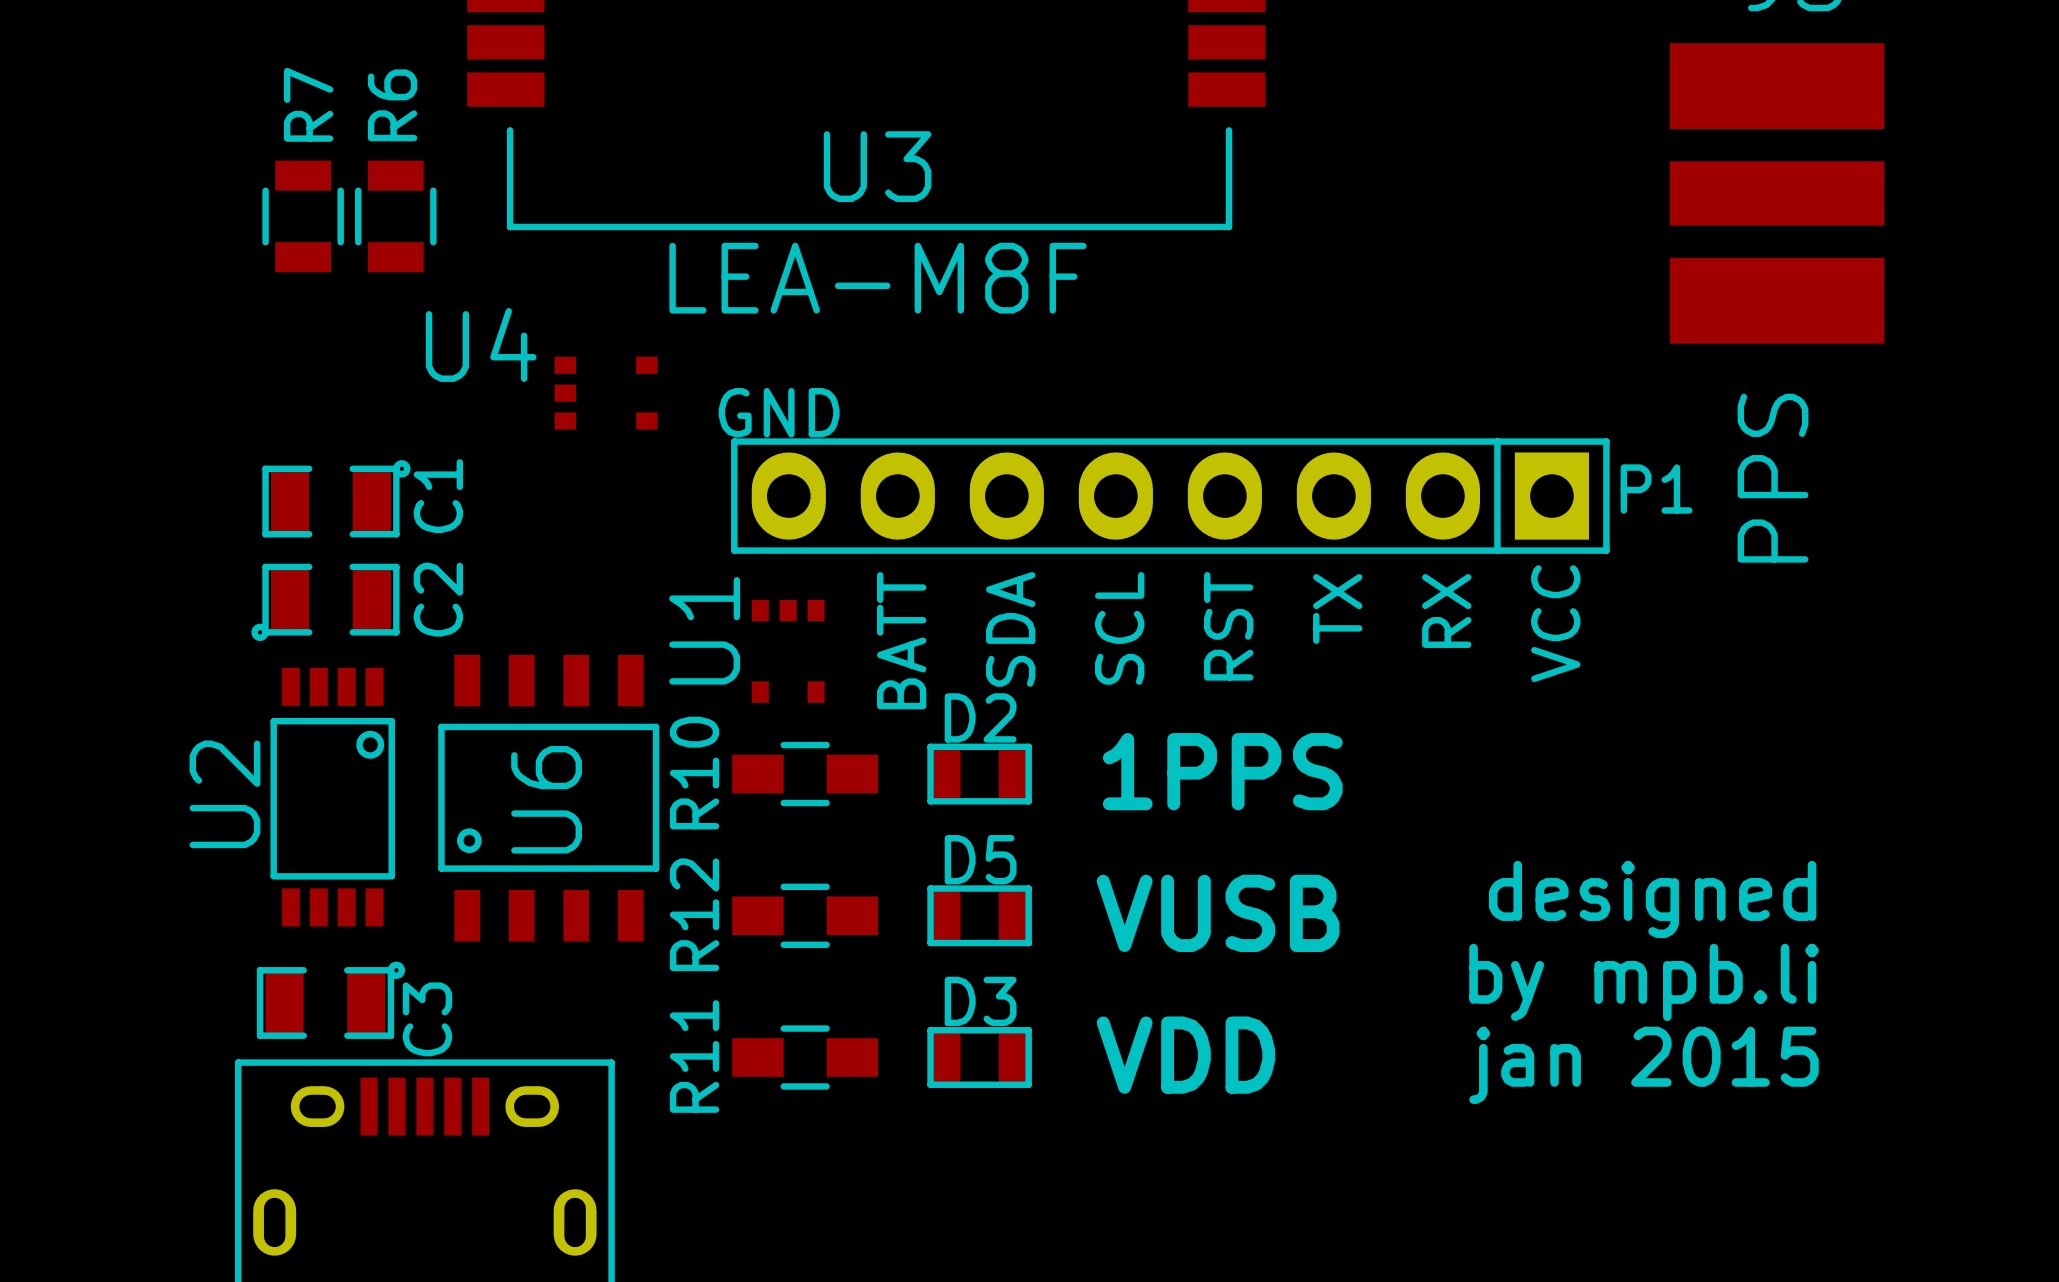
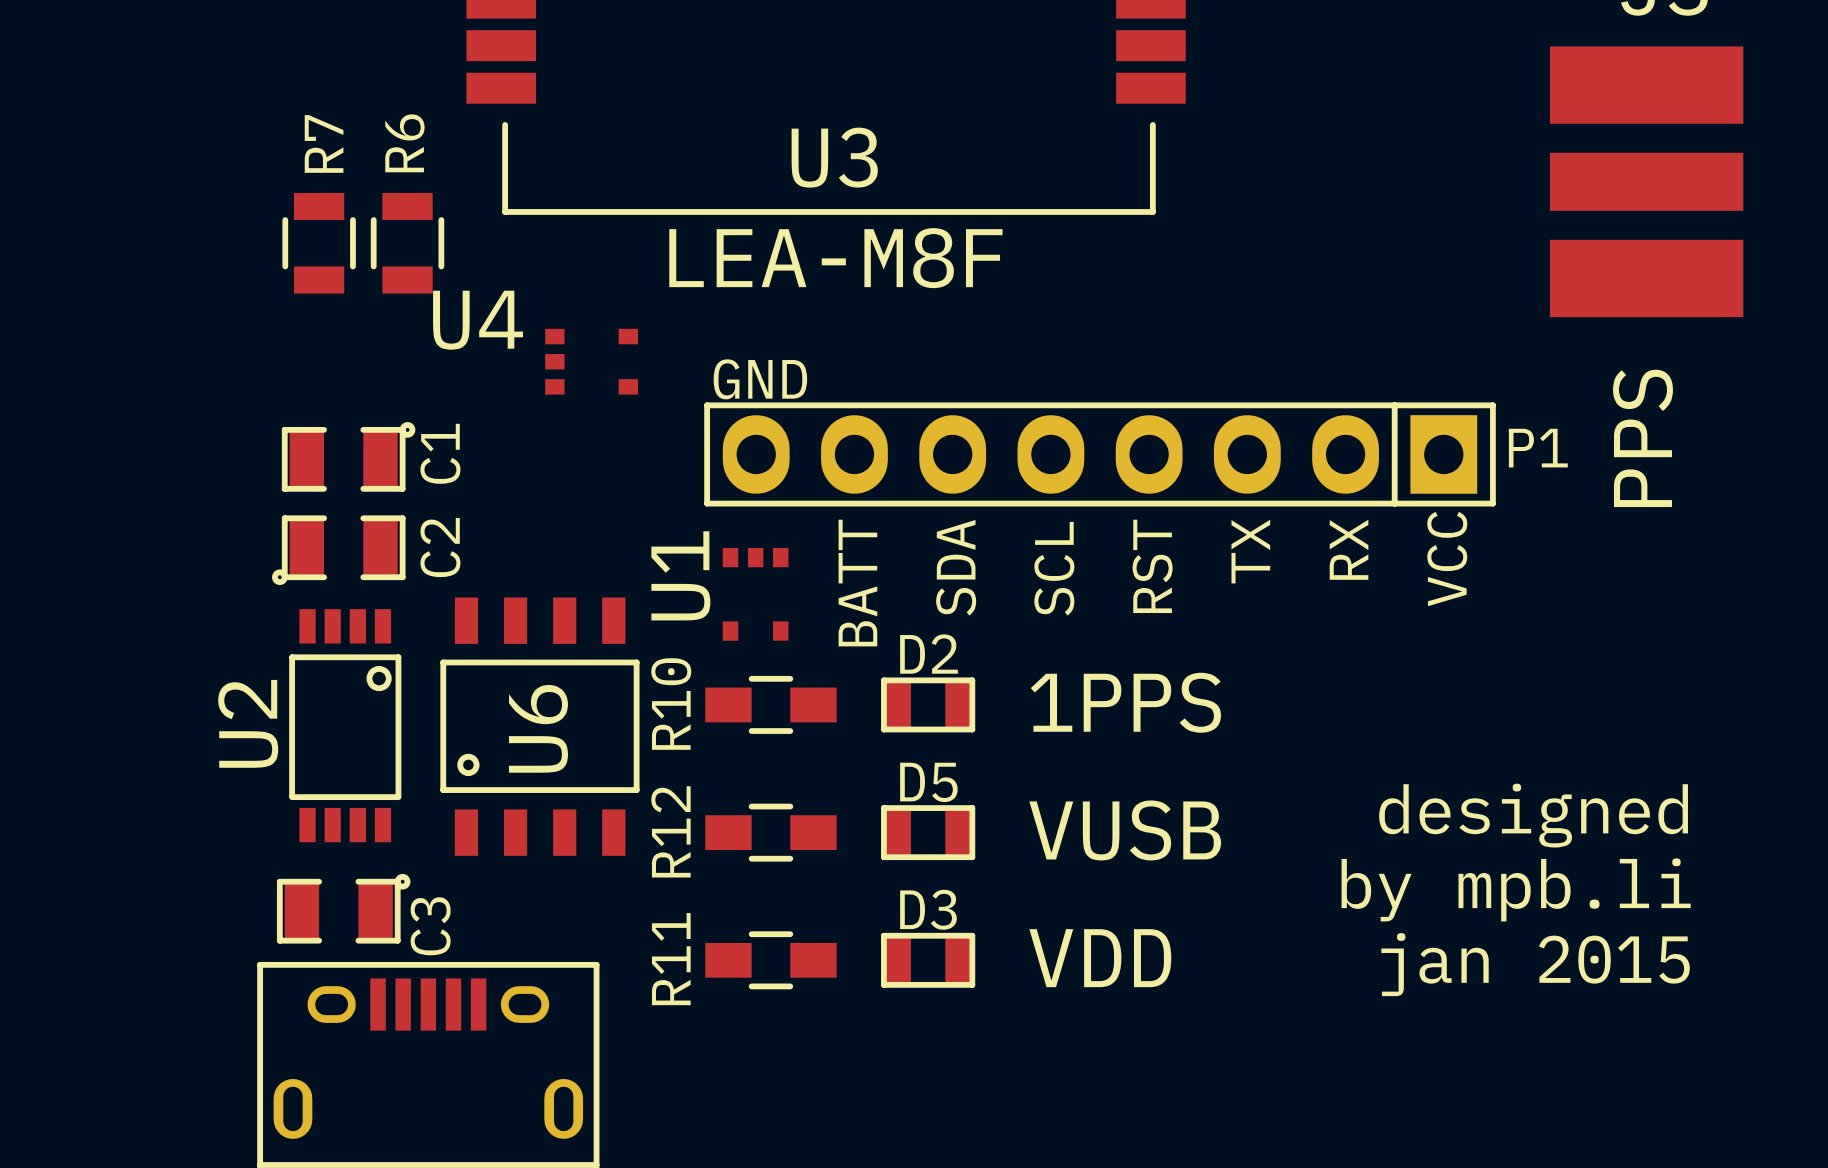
R7 position: (303, 216) -> (319, 243)
R6 position: (395, 216) -> (407, 243)

